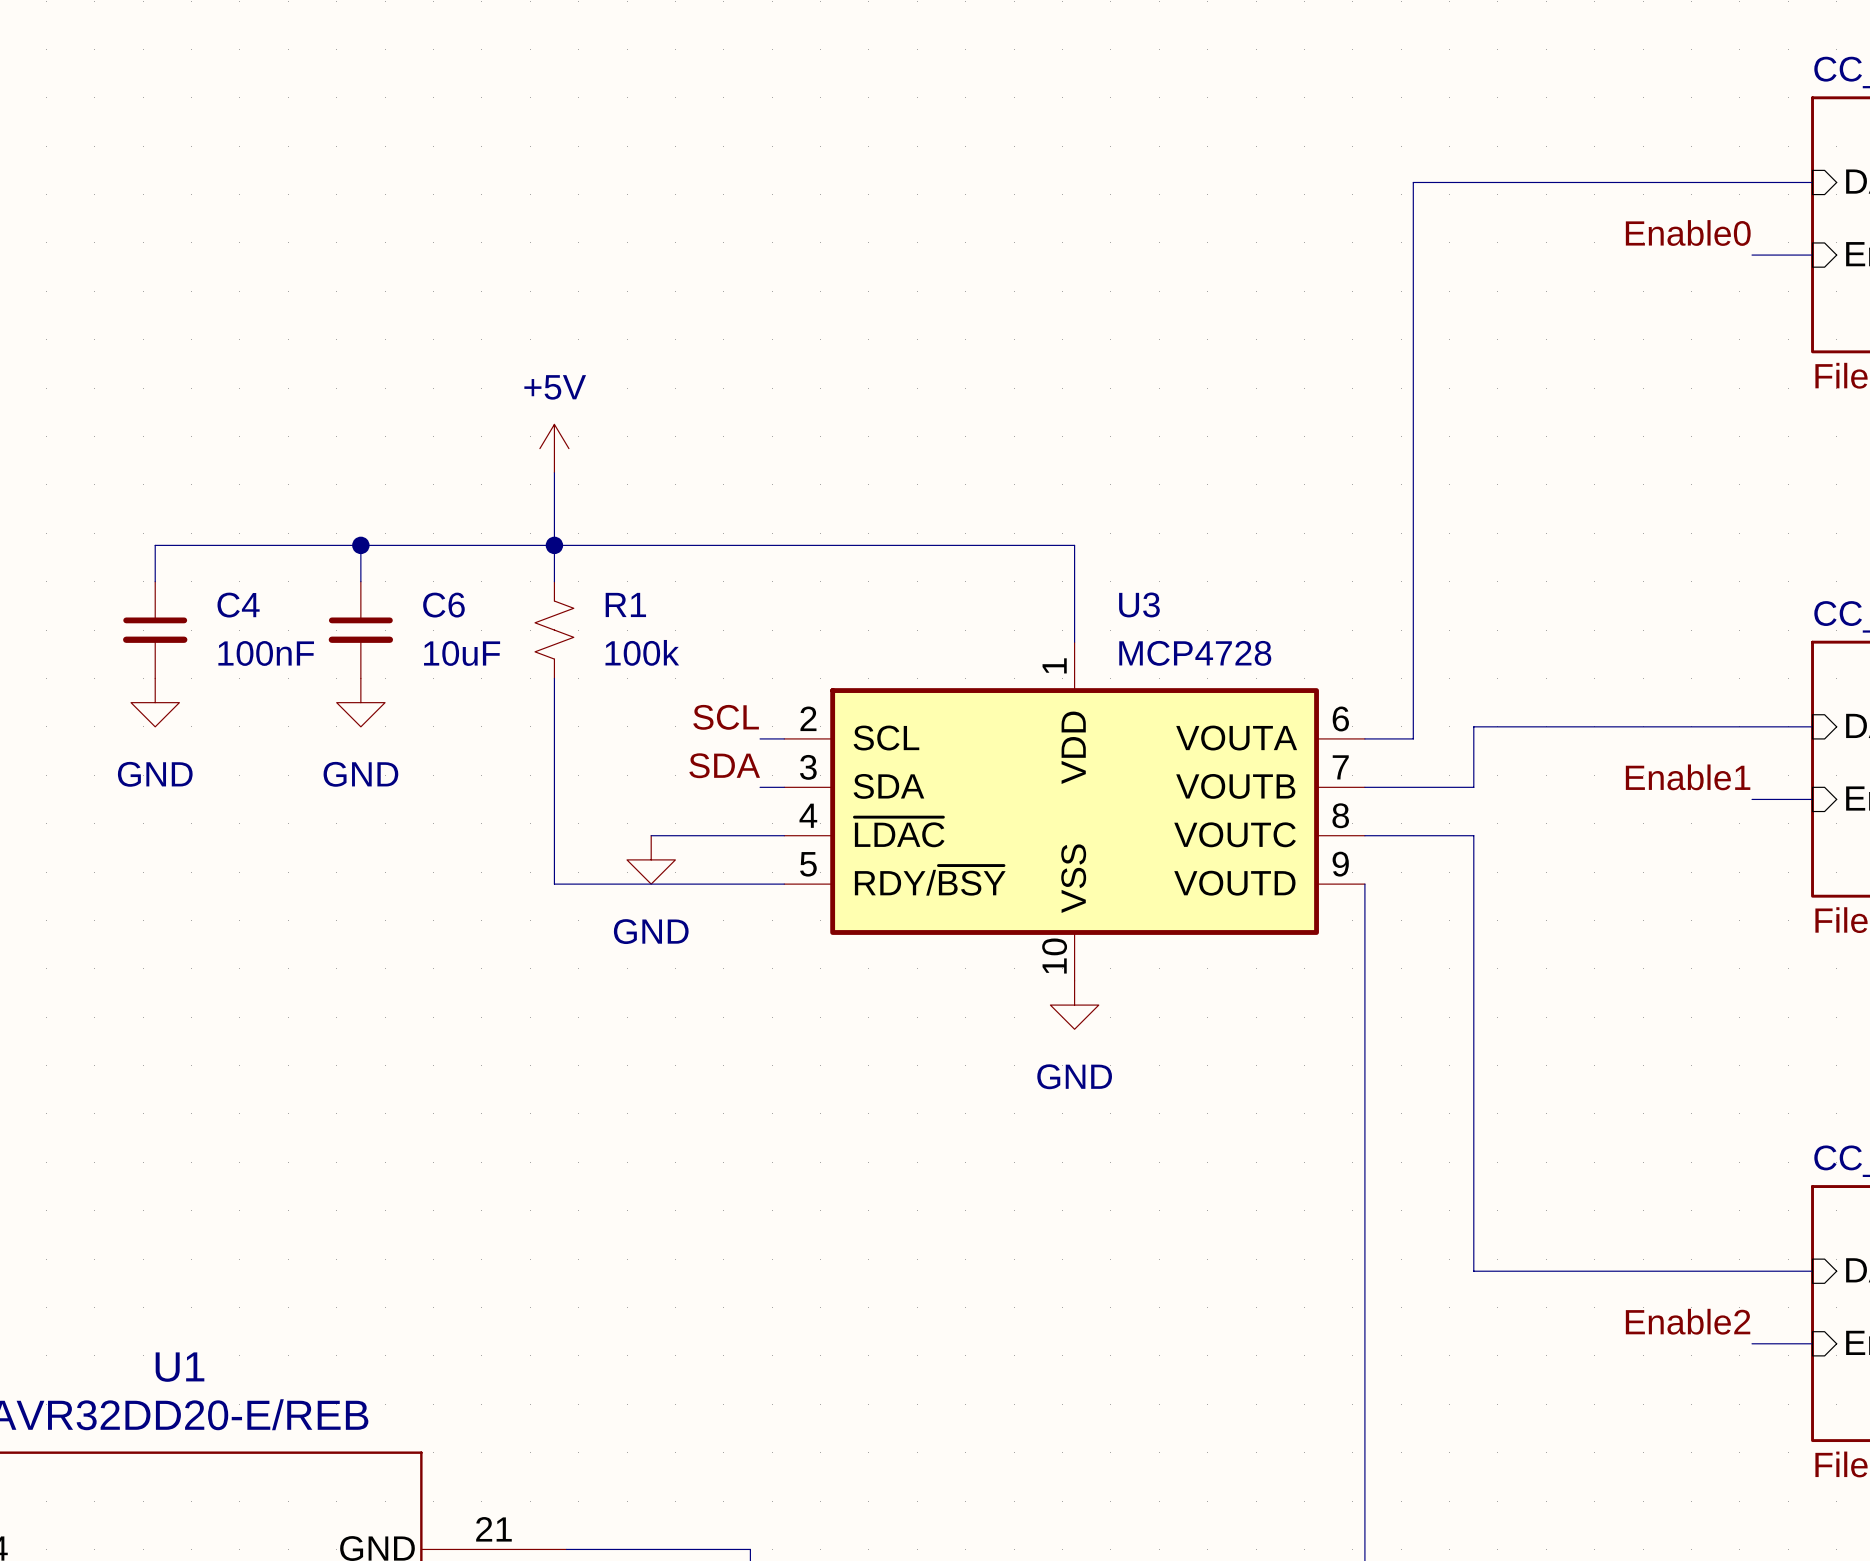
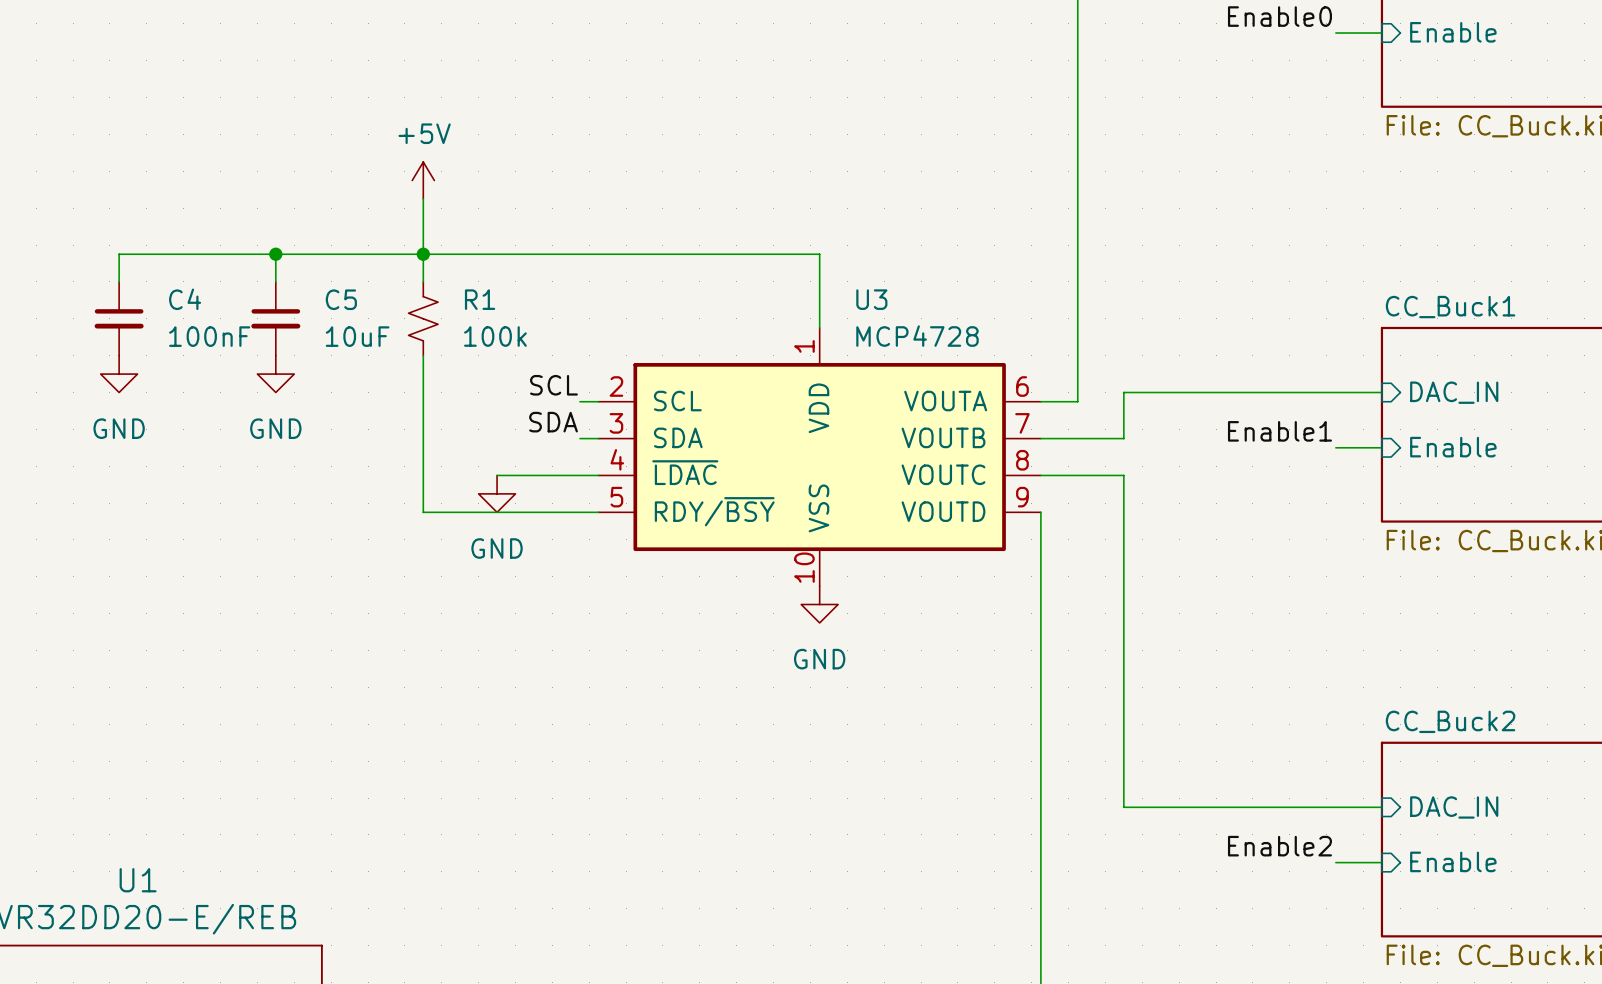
C6 name: C6 (443, 605) -> C5 (341, 299)

